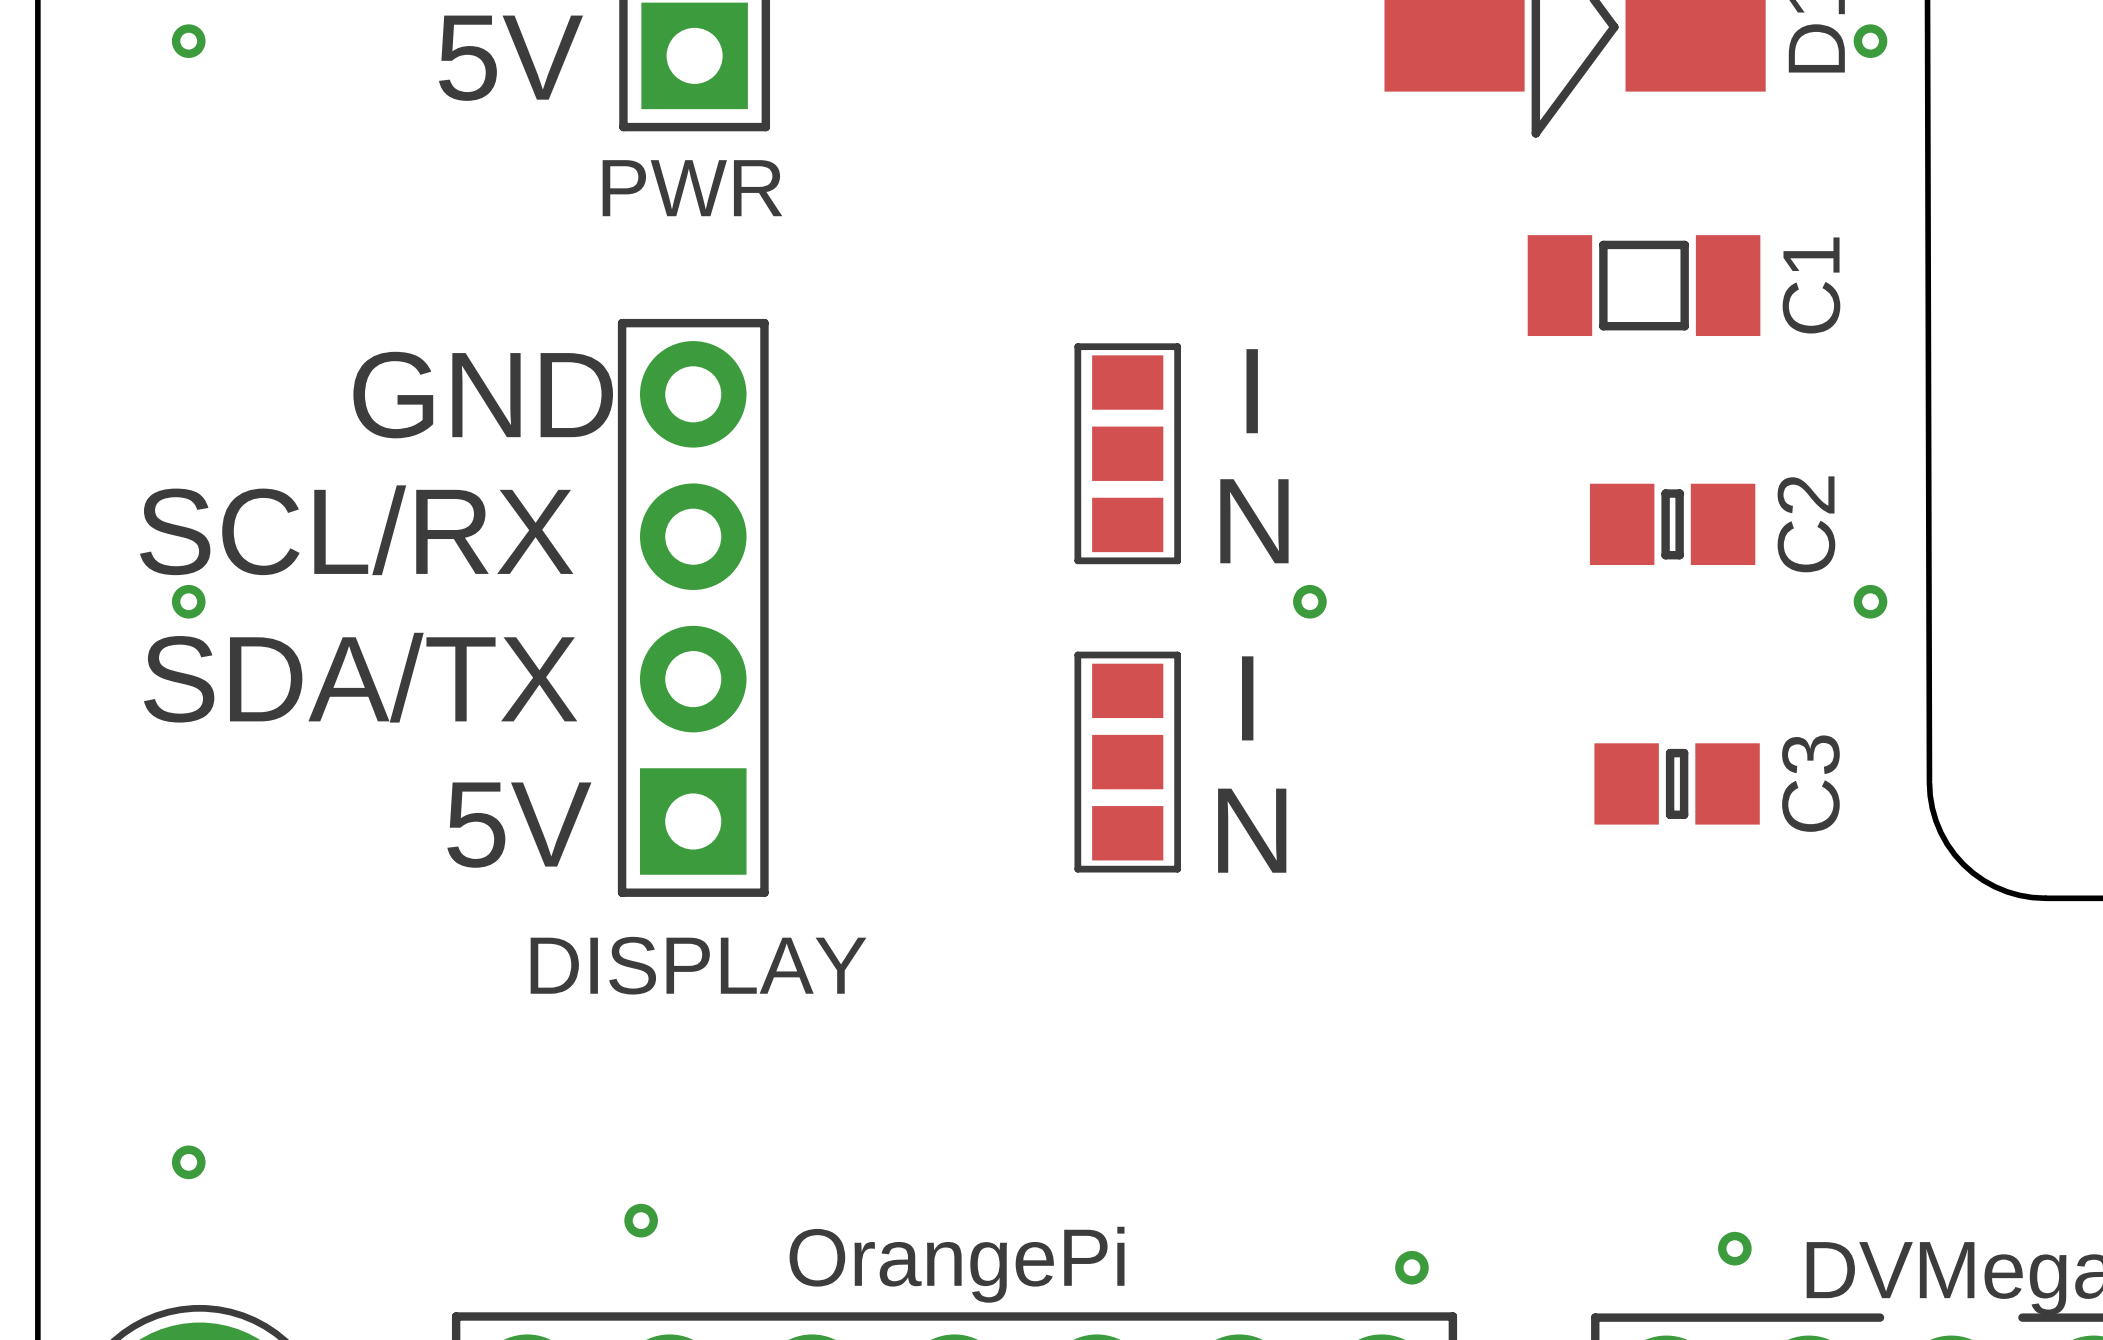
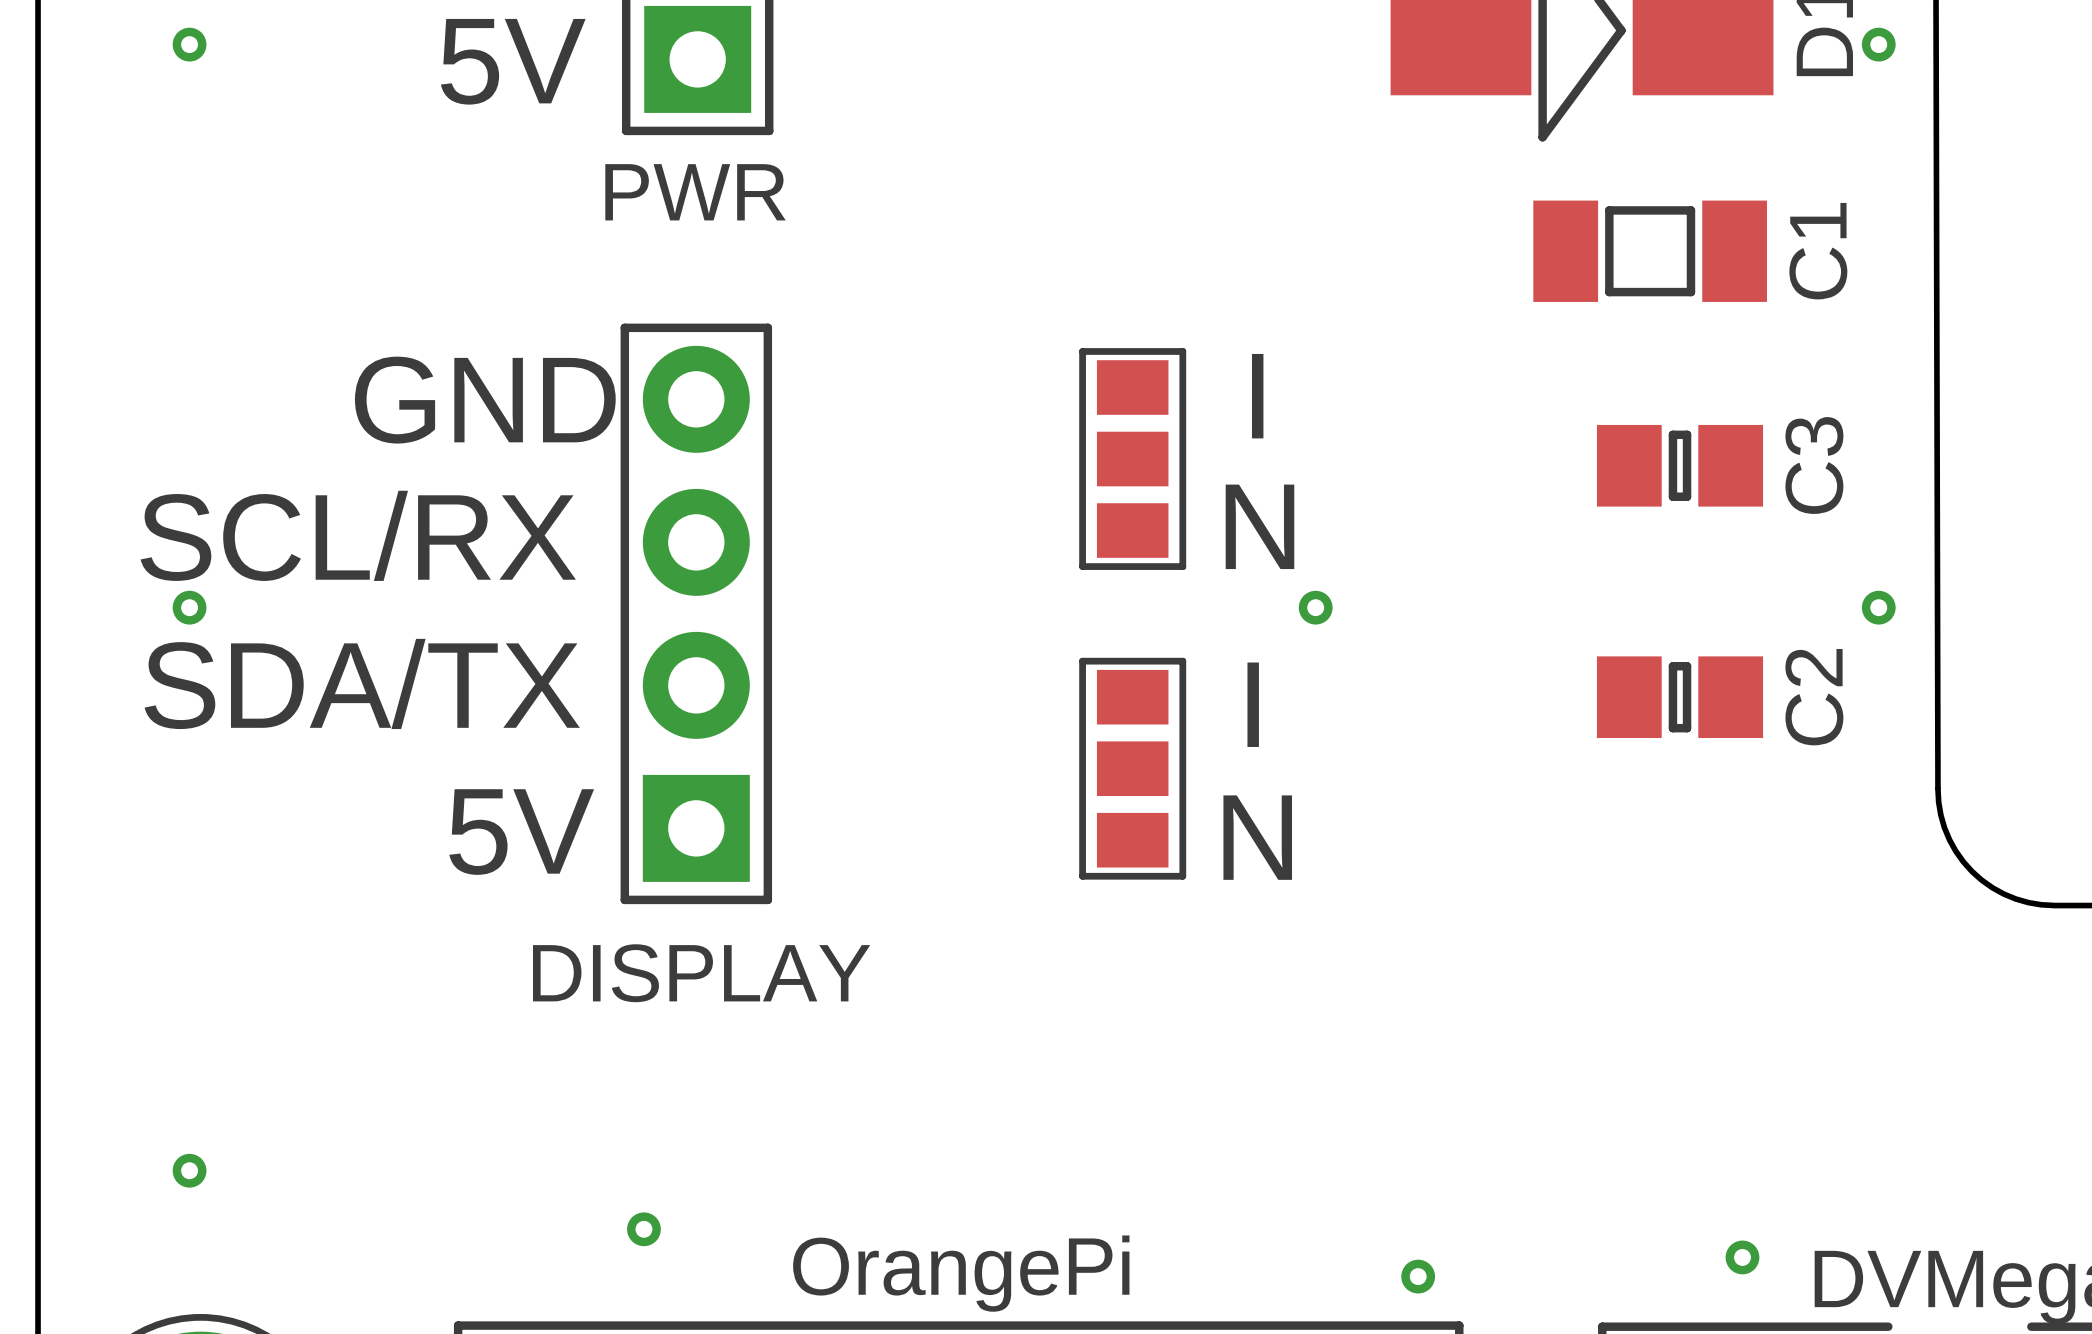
C1 position: (1644, 285) -> (1650, 251)
C2 position: (1672, 524) -> (1680, 697)
C3 position: (1677, 783) -> (1680, 465)

